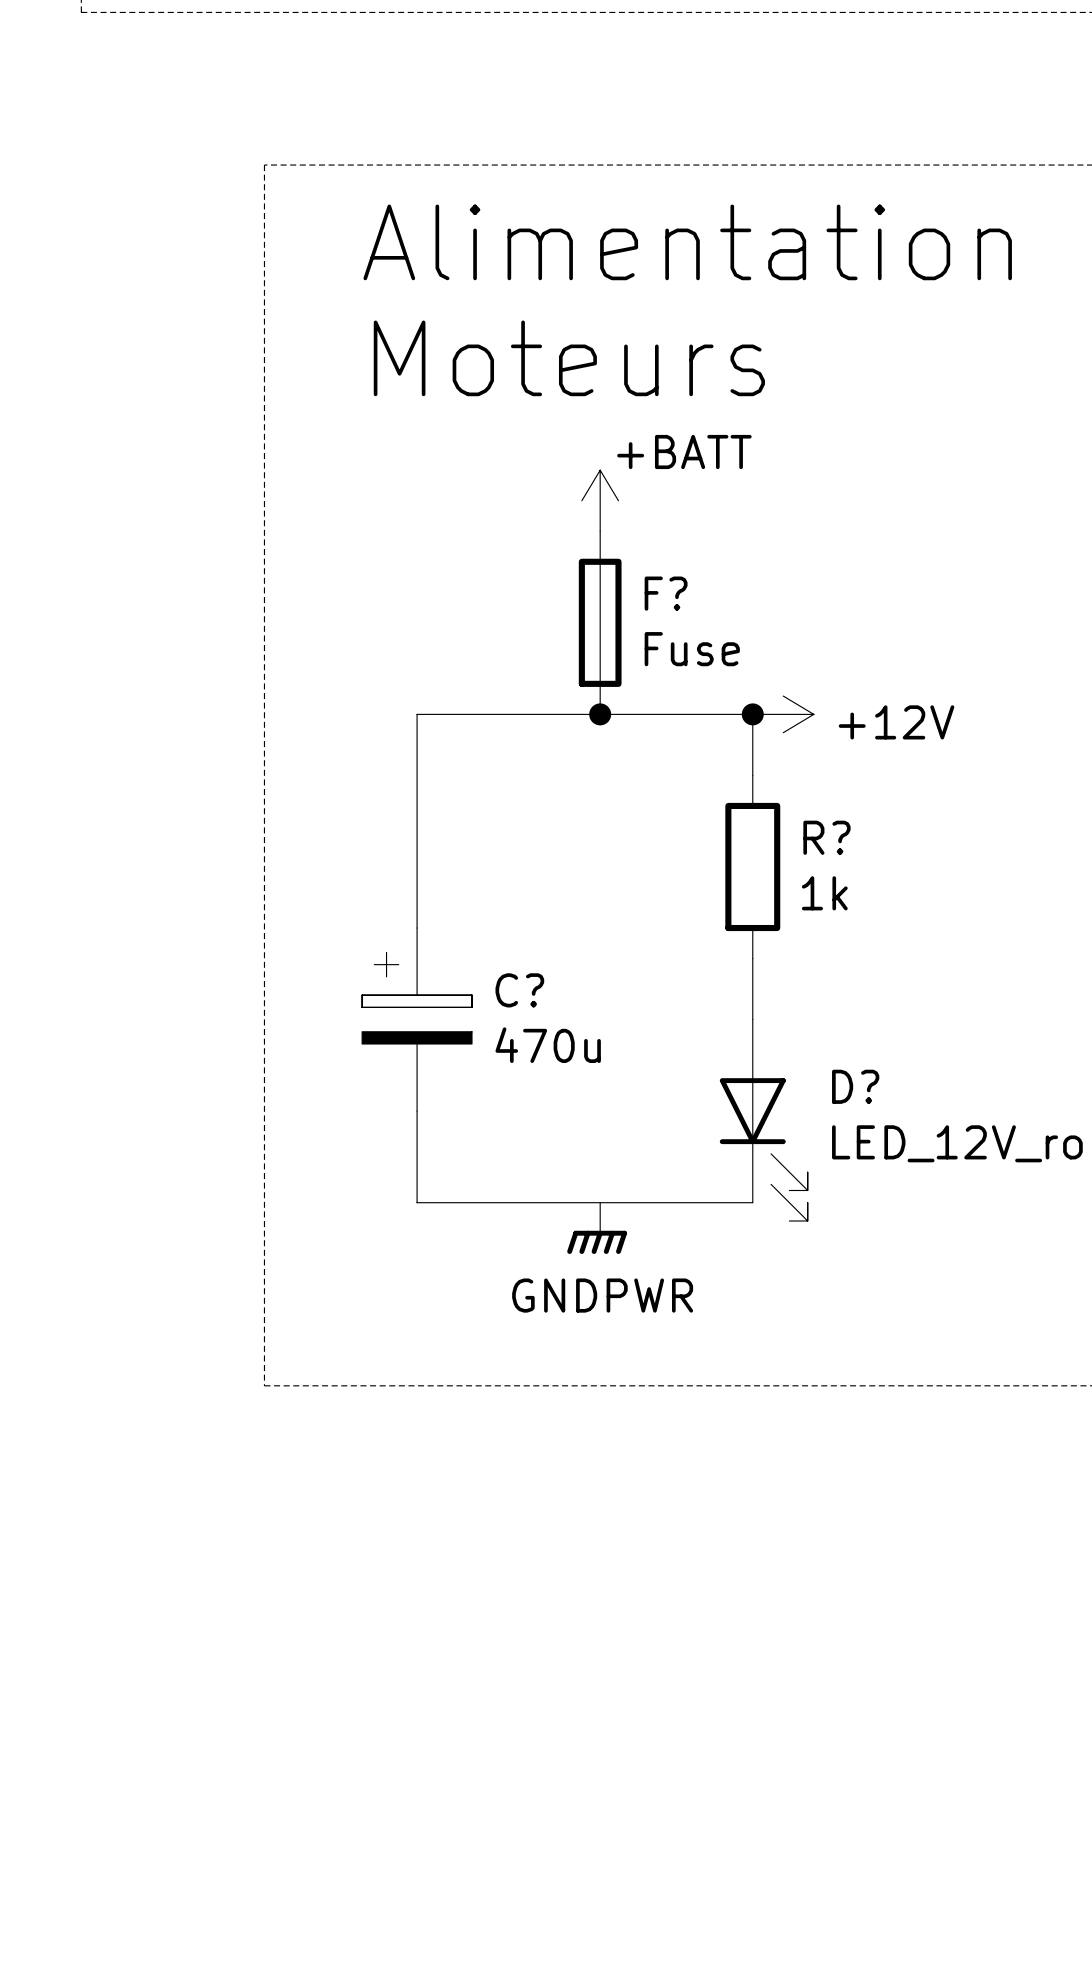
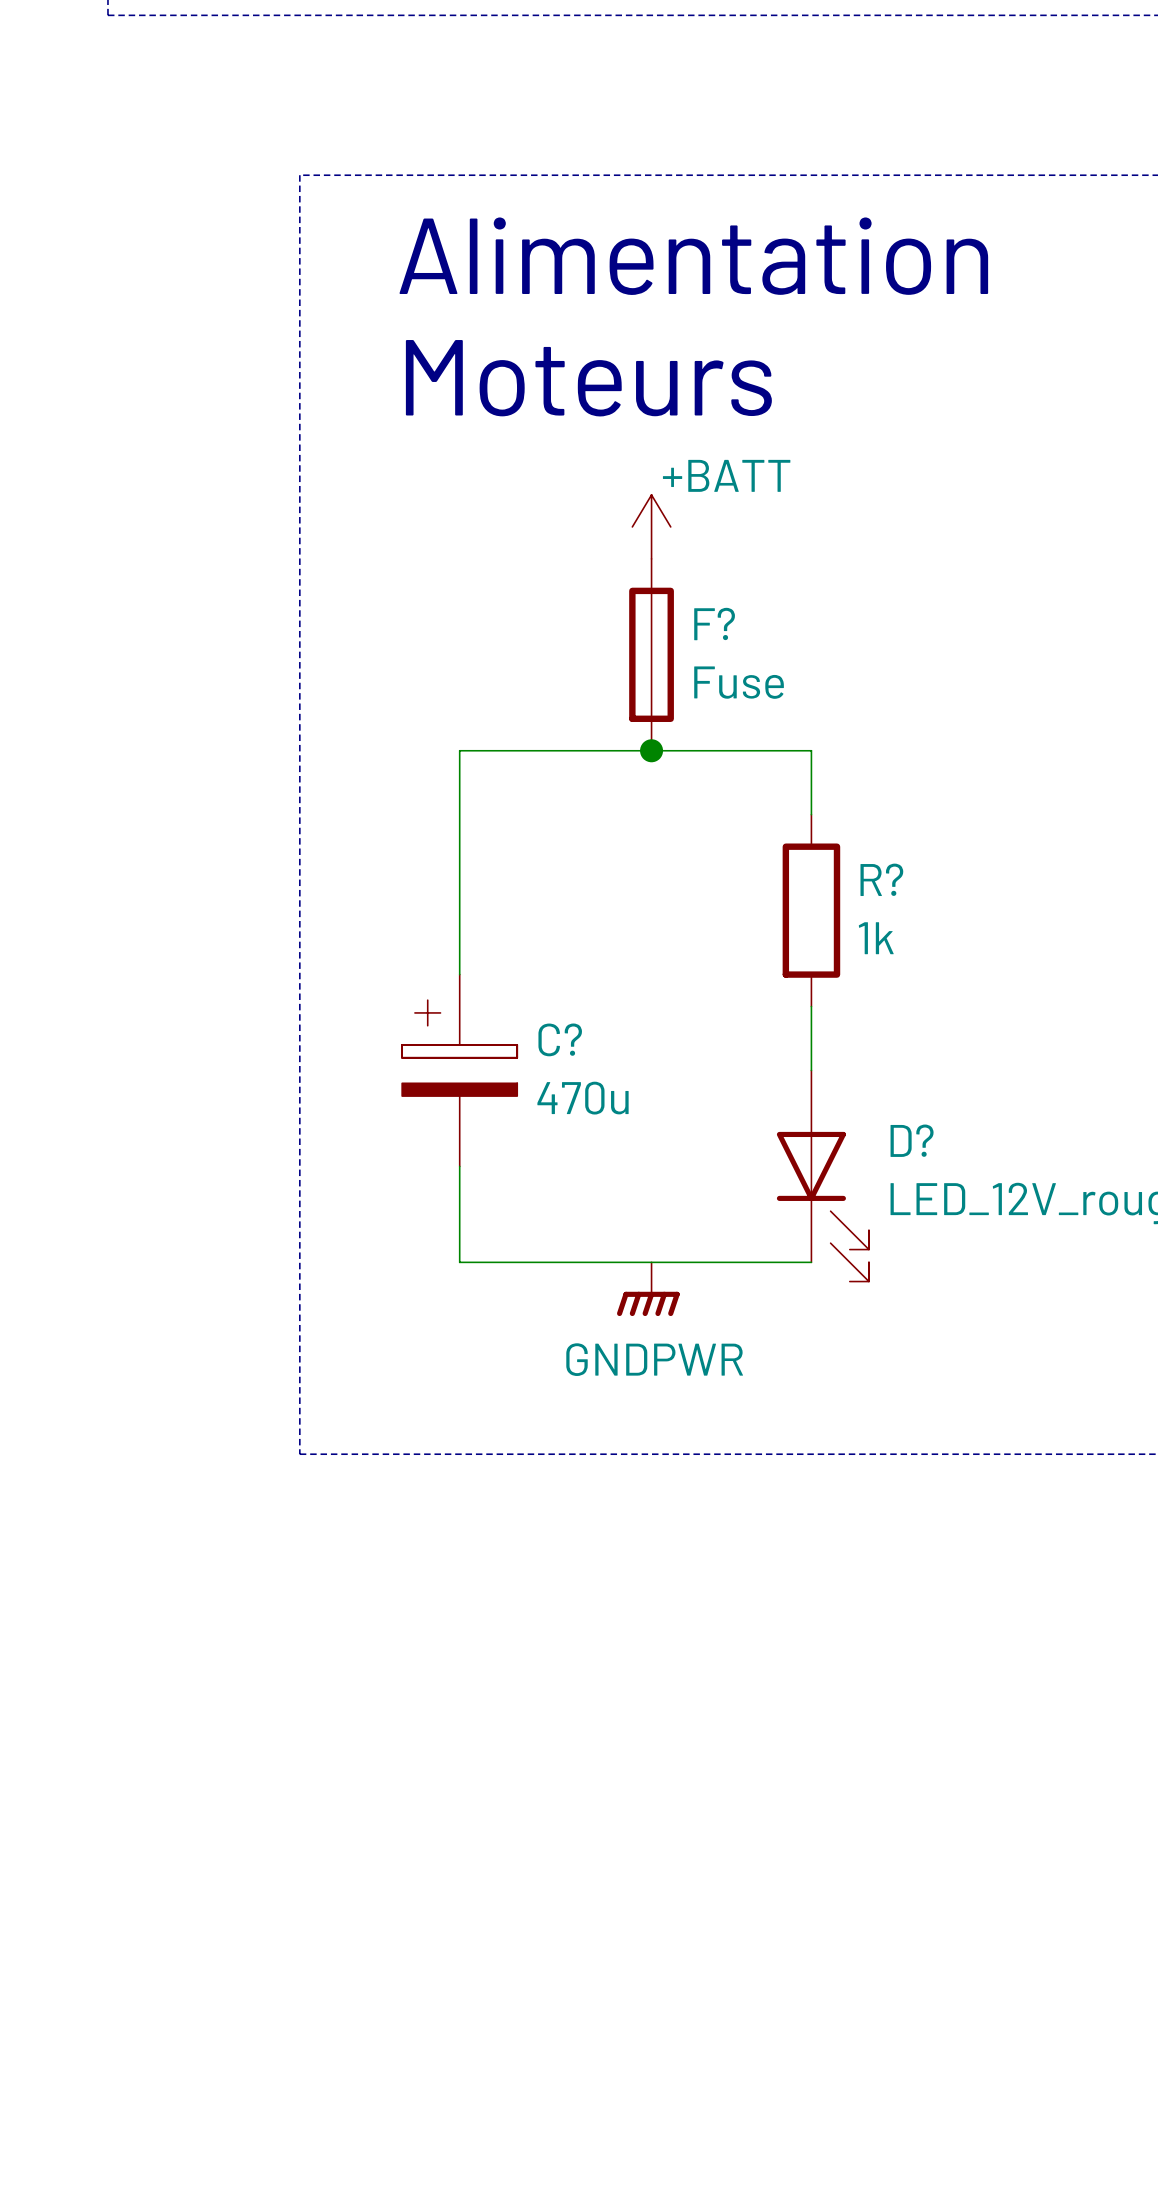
junction: (752, 714) -> none
power symbol: +12V (783, 714) -> none

